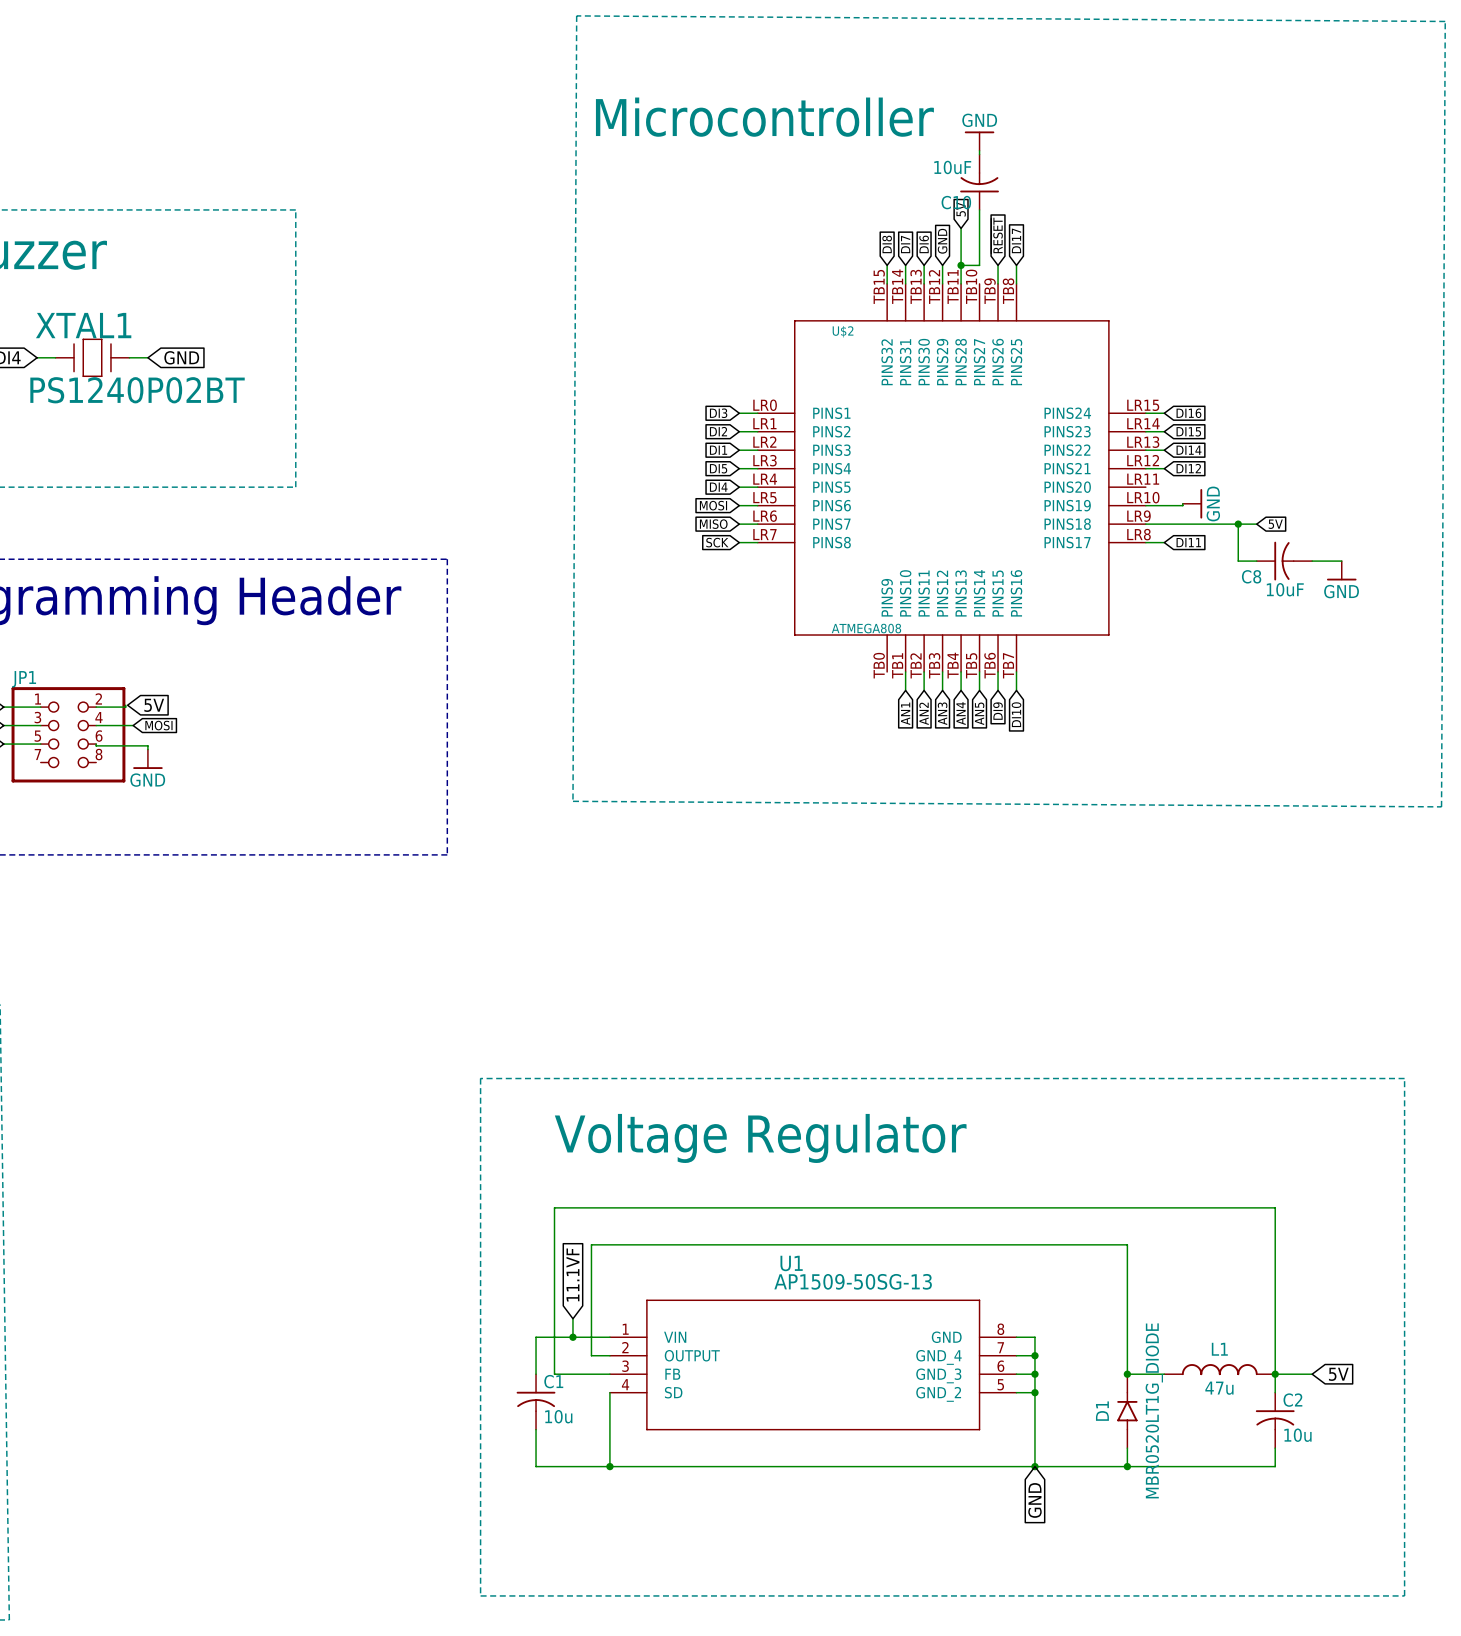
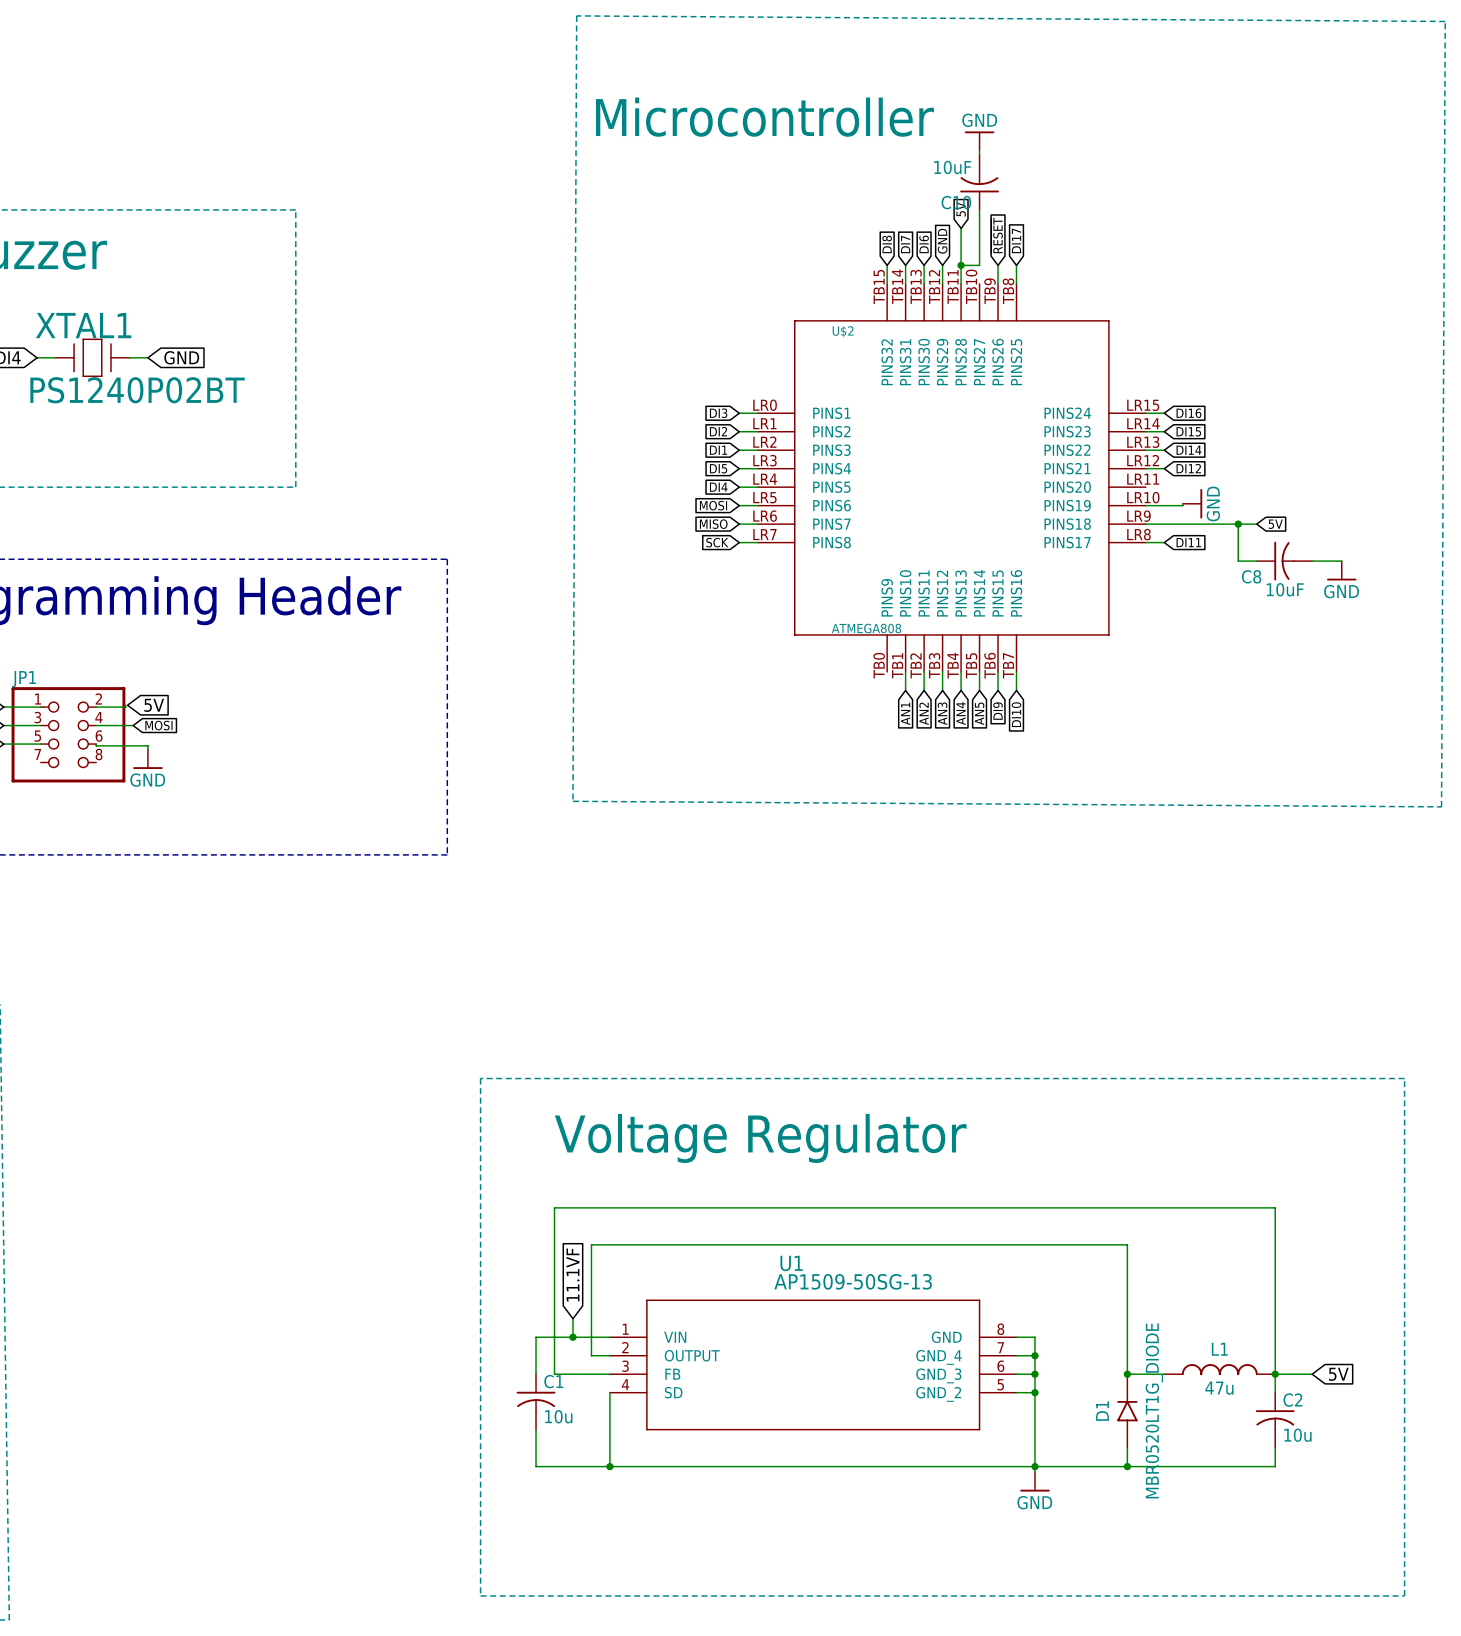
power symbol: none -> GND (1034, 1481)
global label: GND (1034, 1500) -> none

